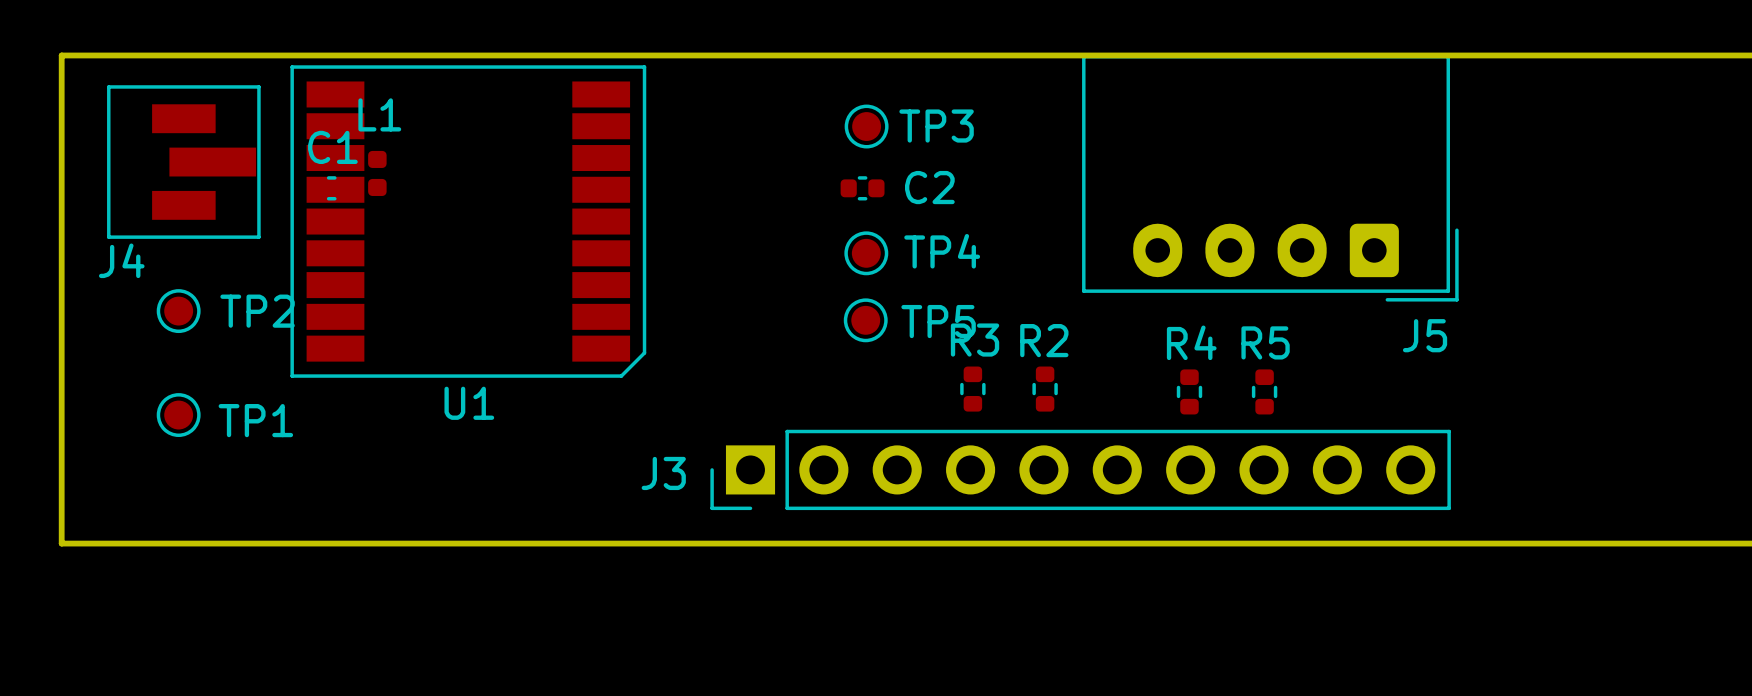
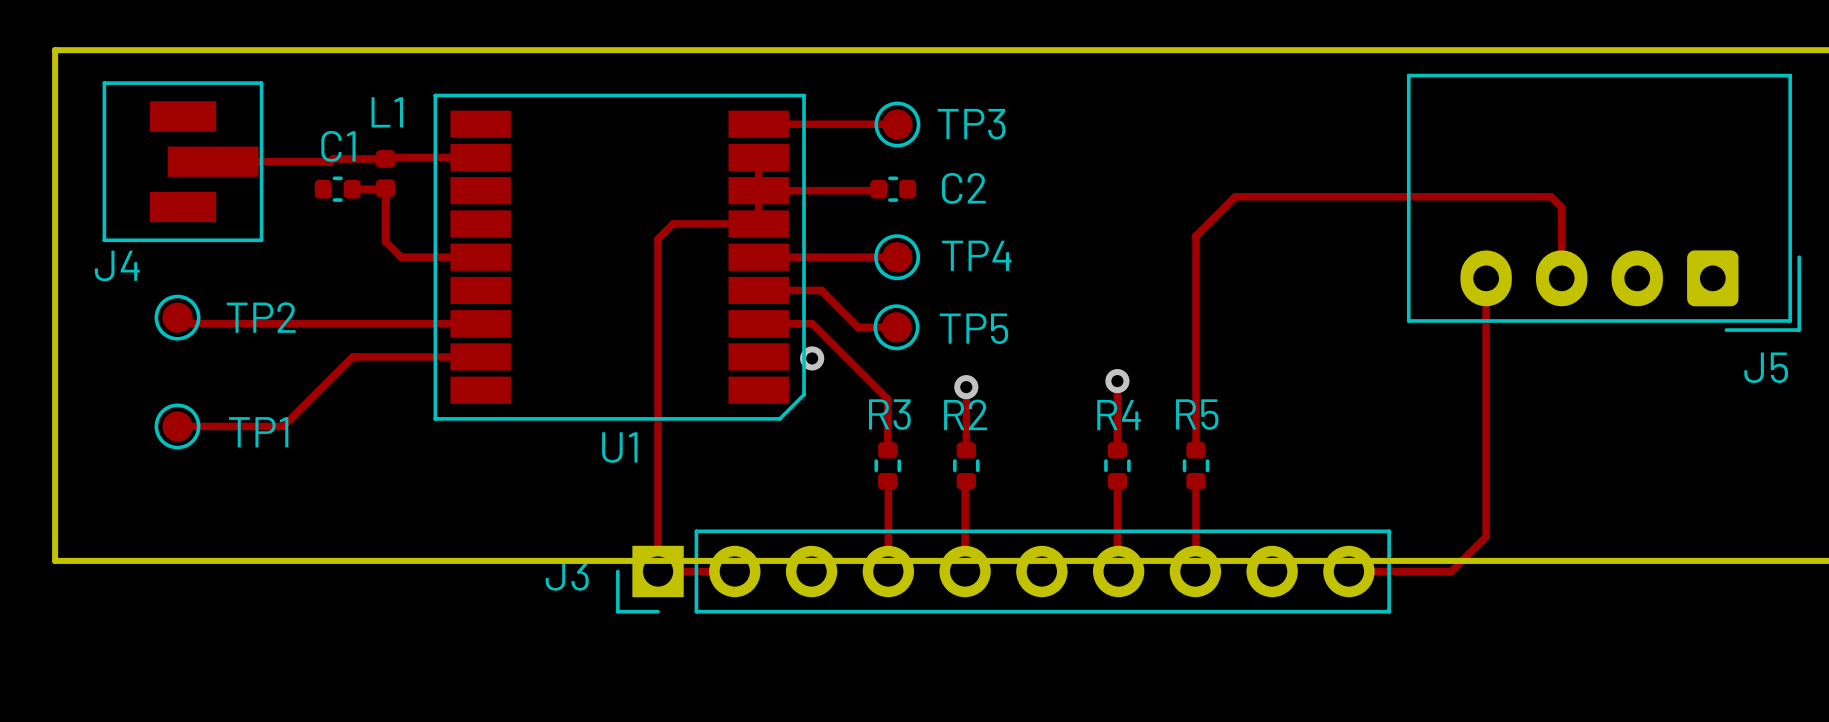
track: none -> (758, 124) (897, 124)
track: none -> (480, 157) (333, 158) (327, 161)
track: none -> (758, 157) (758, 223) (673, 223) (658, 239) (658, 571) (734, 571)
track: none -> (213, 161) (327, 161)
J5 position: (1270, 178) -> (1603, 202)
track: none -> (352, 189) (385, 188) (385, 241) (401, 257) (480, 257)
track: none -> (878, 189) (758, 190)
U1 position: (468, 221) -> (619, 257)
track: none -> (758, 257) (897, 257)
track: none -> (1486, 278) (1486, 536) (1451, 571) (1348, 571)
track: none -> (1561, 278) (1561, 207) (1551, 196) (1235, 196) (1196, 236) (1196, 450)
track: none -> (758, 290) (821, 290) (858, 327) (896, 327)
track: none -> (177, 317) (183, 323) (480, 323)
track: none -> (758, 323) (812, 323) (887, 399) (887, 450)
track: none -> (480, 356) (352, 356) (283, 426) (177, 426)
via: none -> (812, 358)
track: none -> (1117, 381) (1117, 450)
via: none -> (1117, 381)
track: none -> (966, 387) (966, 450)
via: none -> (966, 387)
R3 position: (972, 389) -> (887, 465)
R2 position: (1045, 389) -> (966, 465)
R4 position: (1189, 391) -> (1117, 465)
R5 position: (1264, 391) -> (1196, 465)
track: none -> (887, 481) (888, 571)
track: none -> (966, 481) (965, 571)
track: none -> (1117, 481) (1118, 571)
track: none -> (1196, 481) (1195, 571)
J3 position: (1080, 469) -> (1003, 571)

